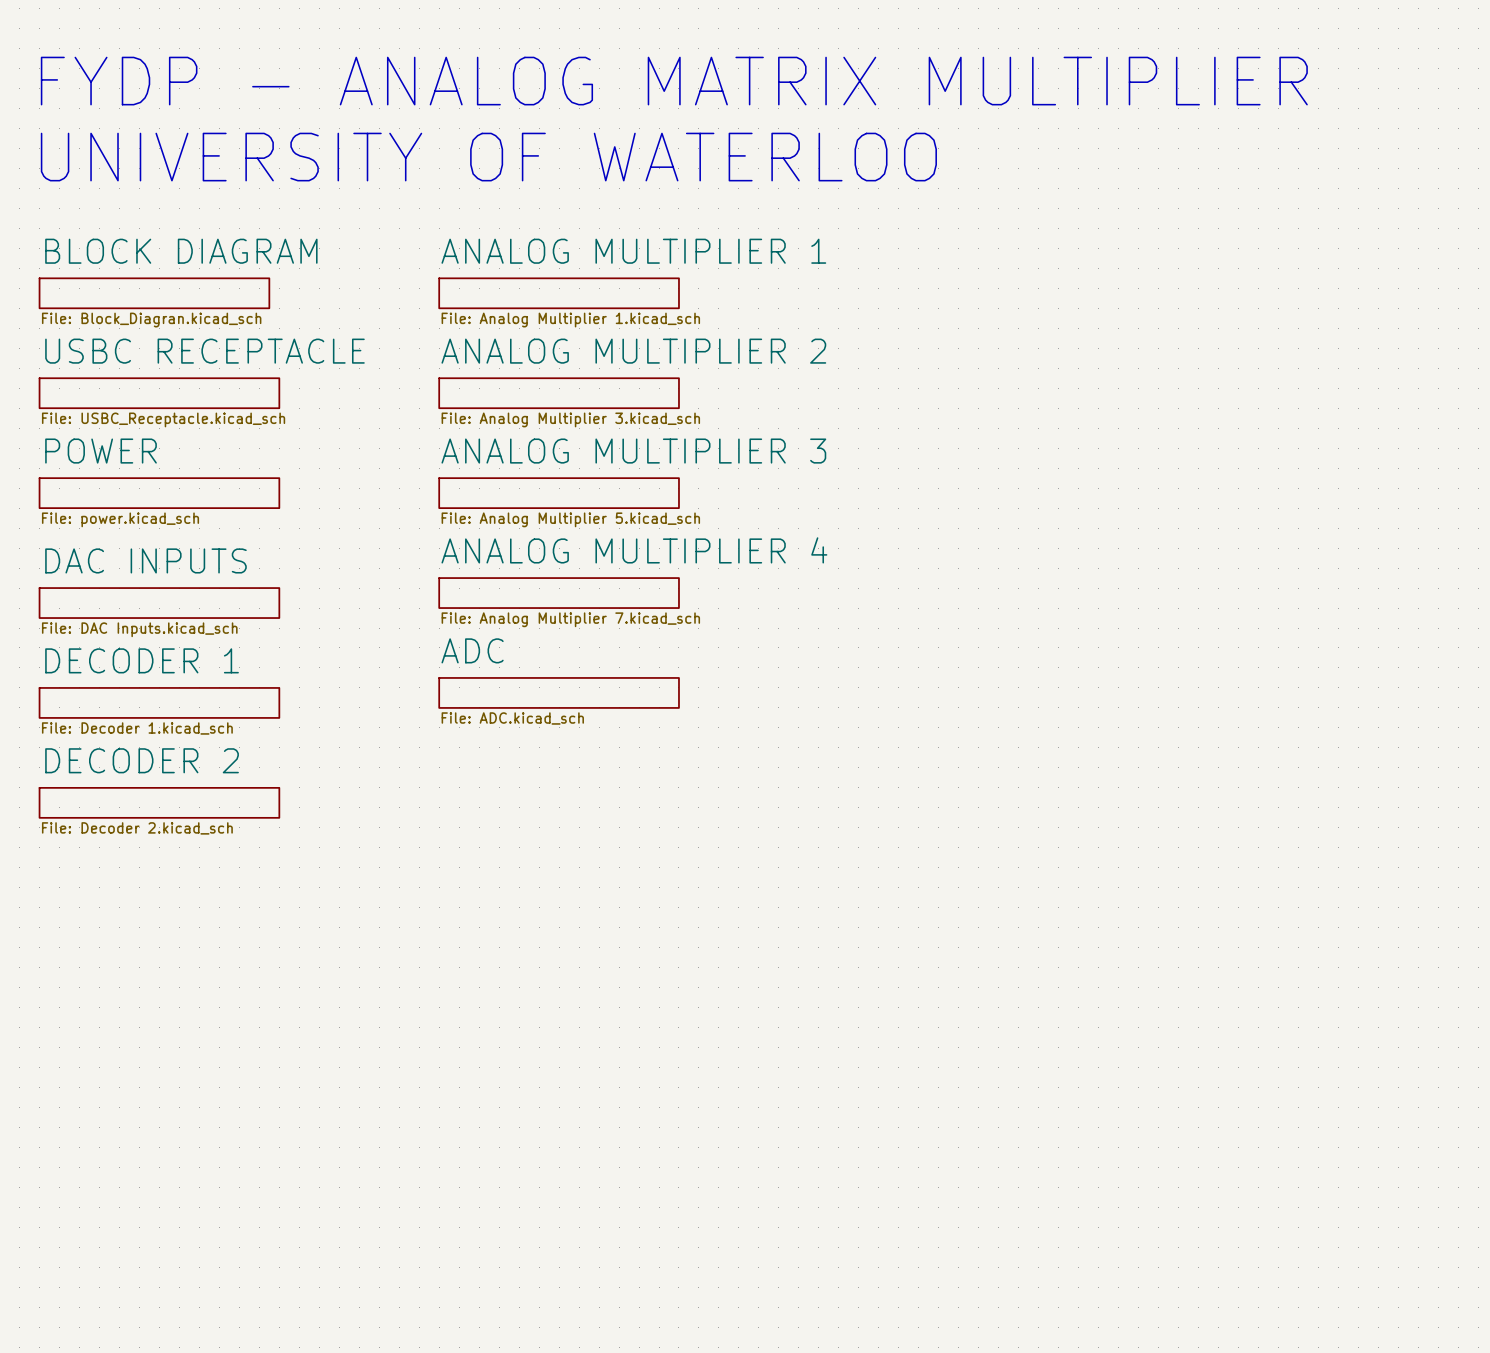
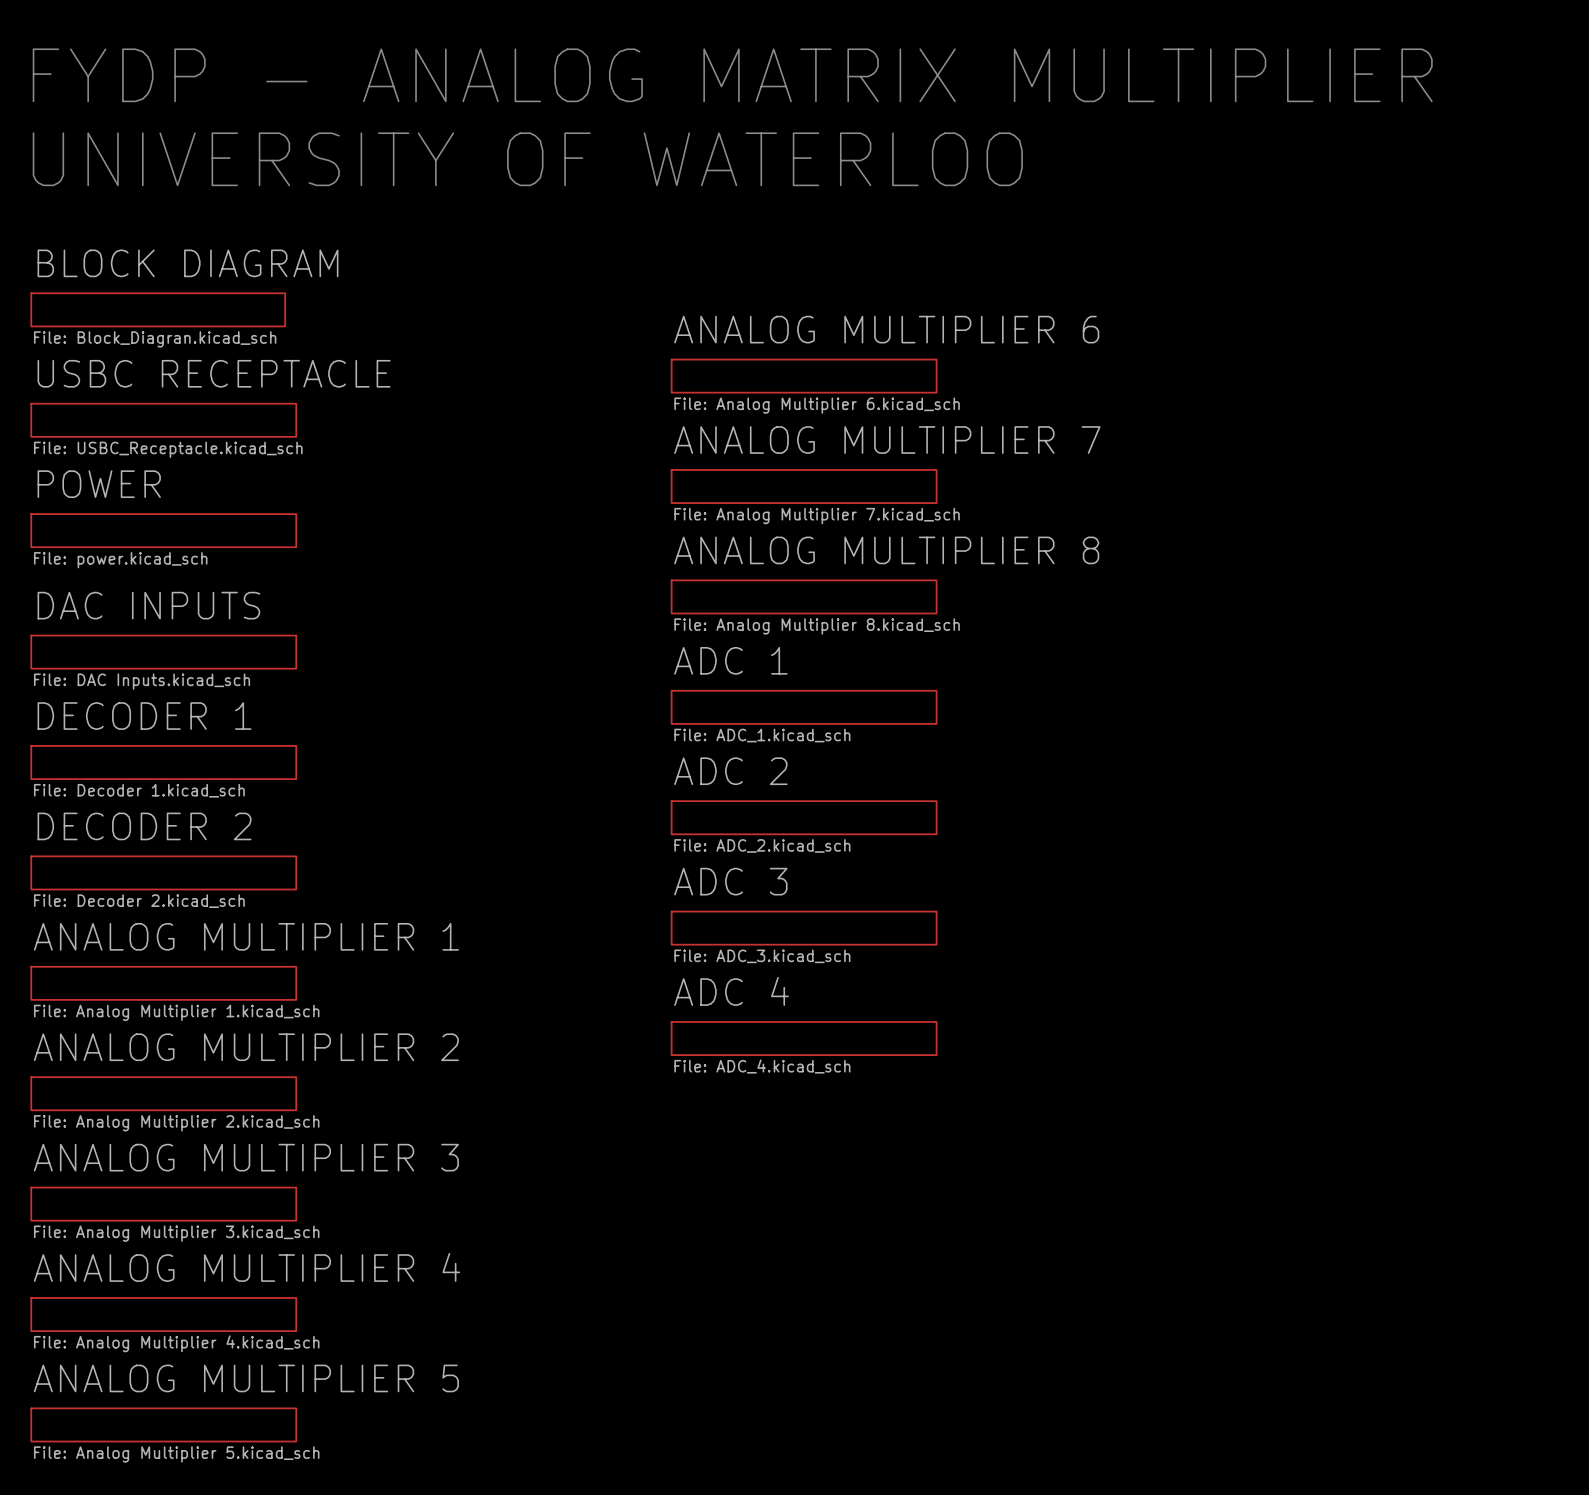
sheet ANALOG MULTIPLIER 1 position: (559, 293) -> (163, 983)
sheet ANALOG MULTIPLIER 6: none -> File: Analog Multiplier 6.kicad_sch (804, 376)
sheet ANALOG MULTIPLIER 2 position: (559, 393) -> (163, 1093)
sheet ANALOG MULTIPLIER 2 value: File: Analog Multiplier 3.kicad_sch (570, 419) -> File: Analog Multiplier 2.kicad_sch (176, 1123)
sheet ANALOG MULTIPLIER 7: none -> File: Analog Multiplier 7.kicad_sch (804, 486)
sheet ANALOG MULTIPLIER 3 position: (559, 493) -> (163, 1204)
sheet ANALOG MULTIPLIER 3 value: File: Analog Multiplier 5.kicad_sch (570, 519) -> File: Analog Multiplier 3.kicad_sch (176, 1233)
sheet ANALOG MULTIPLIER 8: none -> File: Analog Multiplier 8.kicad_sch (804, 596)
sheet ANALOG MULTIPLIER 4 position: (559, 593) -> (163, 1314)
sheet ANALOG MULTIPLIER 4 value: File: Analog Multiplier 7.kicad_sch (570, 619) -> File: Analog Multiplier 4.kicad_sch (176, 1343)
sheet ADC 1: none -> File: ADC_1.kicad_sch (804, 707)
sheet ADC: File: ADC.kicad_sch (559, 692) -> none
sheet ADC 2: none -> File: ADC_2.kicad_sch (804, 817)
sheet ADC 3: none -> File: ADC_3.kicad_sch (804, 928)
sheet ADC 4: none -> File: ADC_4.kicad_sch (804, 1038)
sheet ANALOG MULTIPLIER 5: none -> File: Analog Multiplier 5.kicad_sch (163, 1424)

